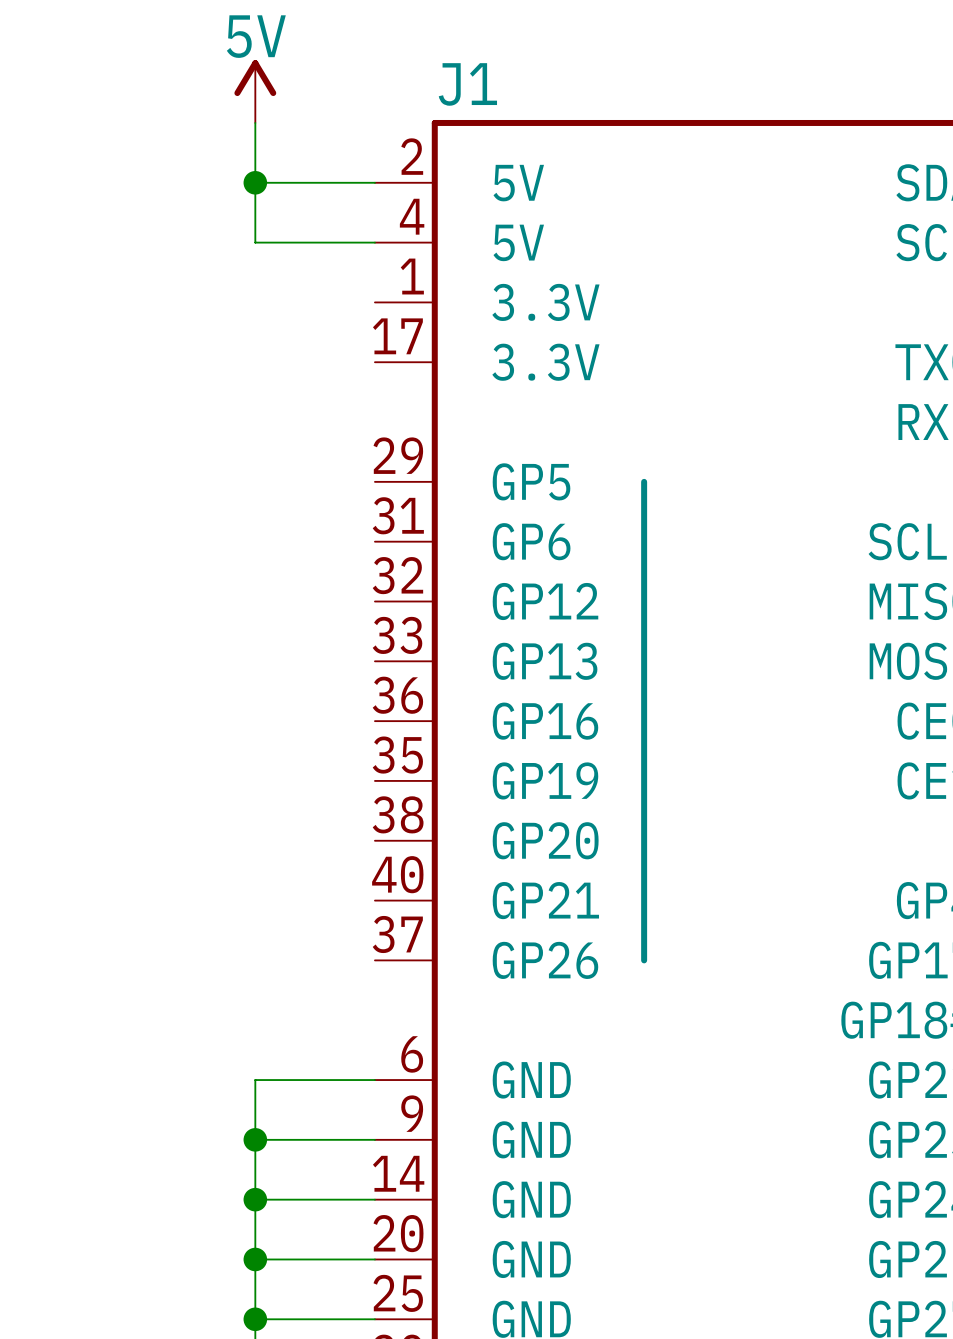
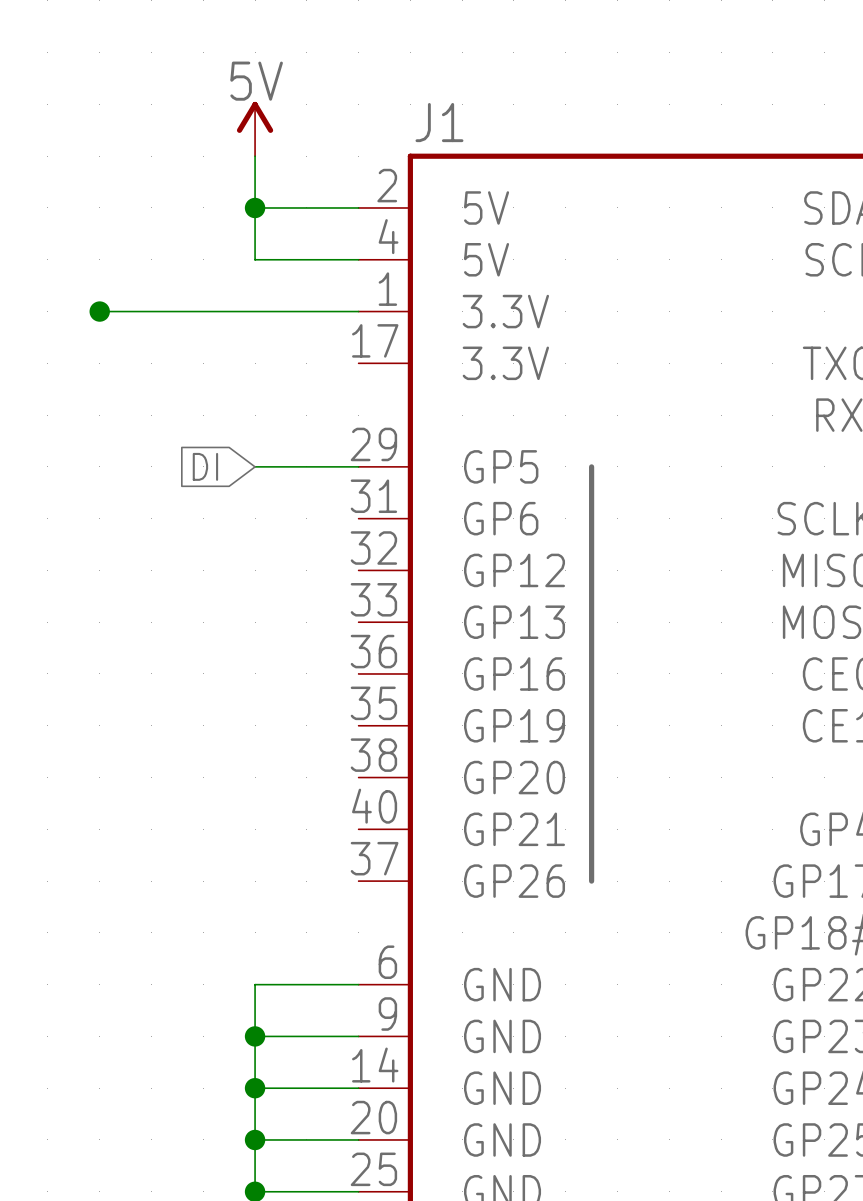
wire: none -> (99, 311) (358, 311)
junction: none -> (99, 311)
global label: none -> DI (205, 466)
wire: none -> (255, 466) (358, 466)

